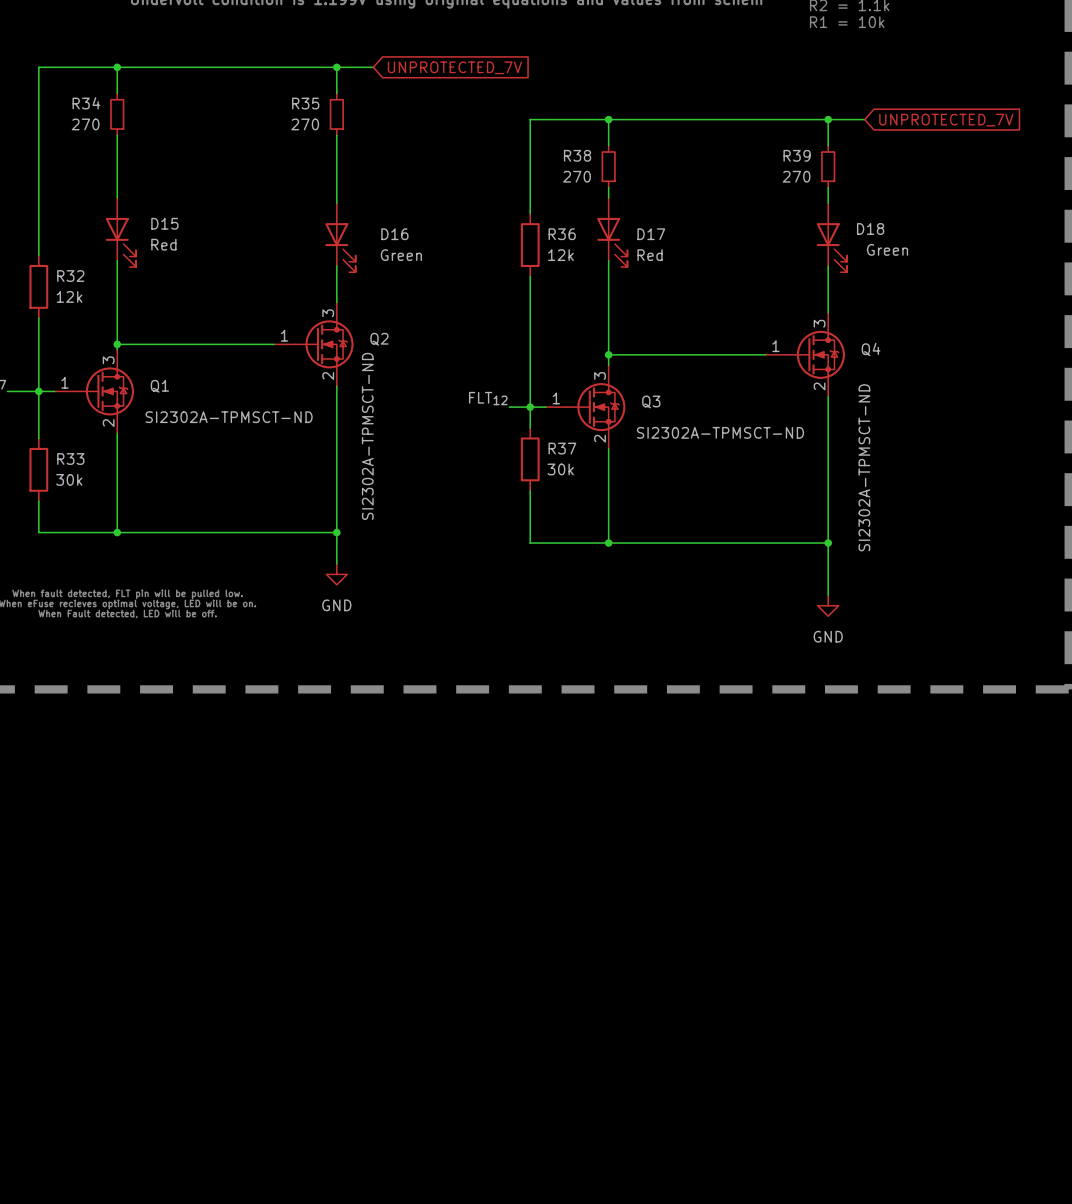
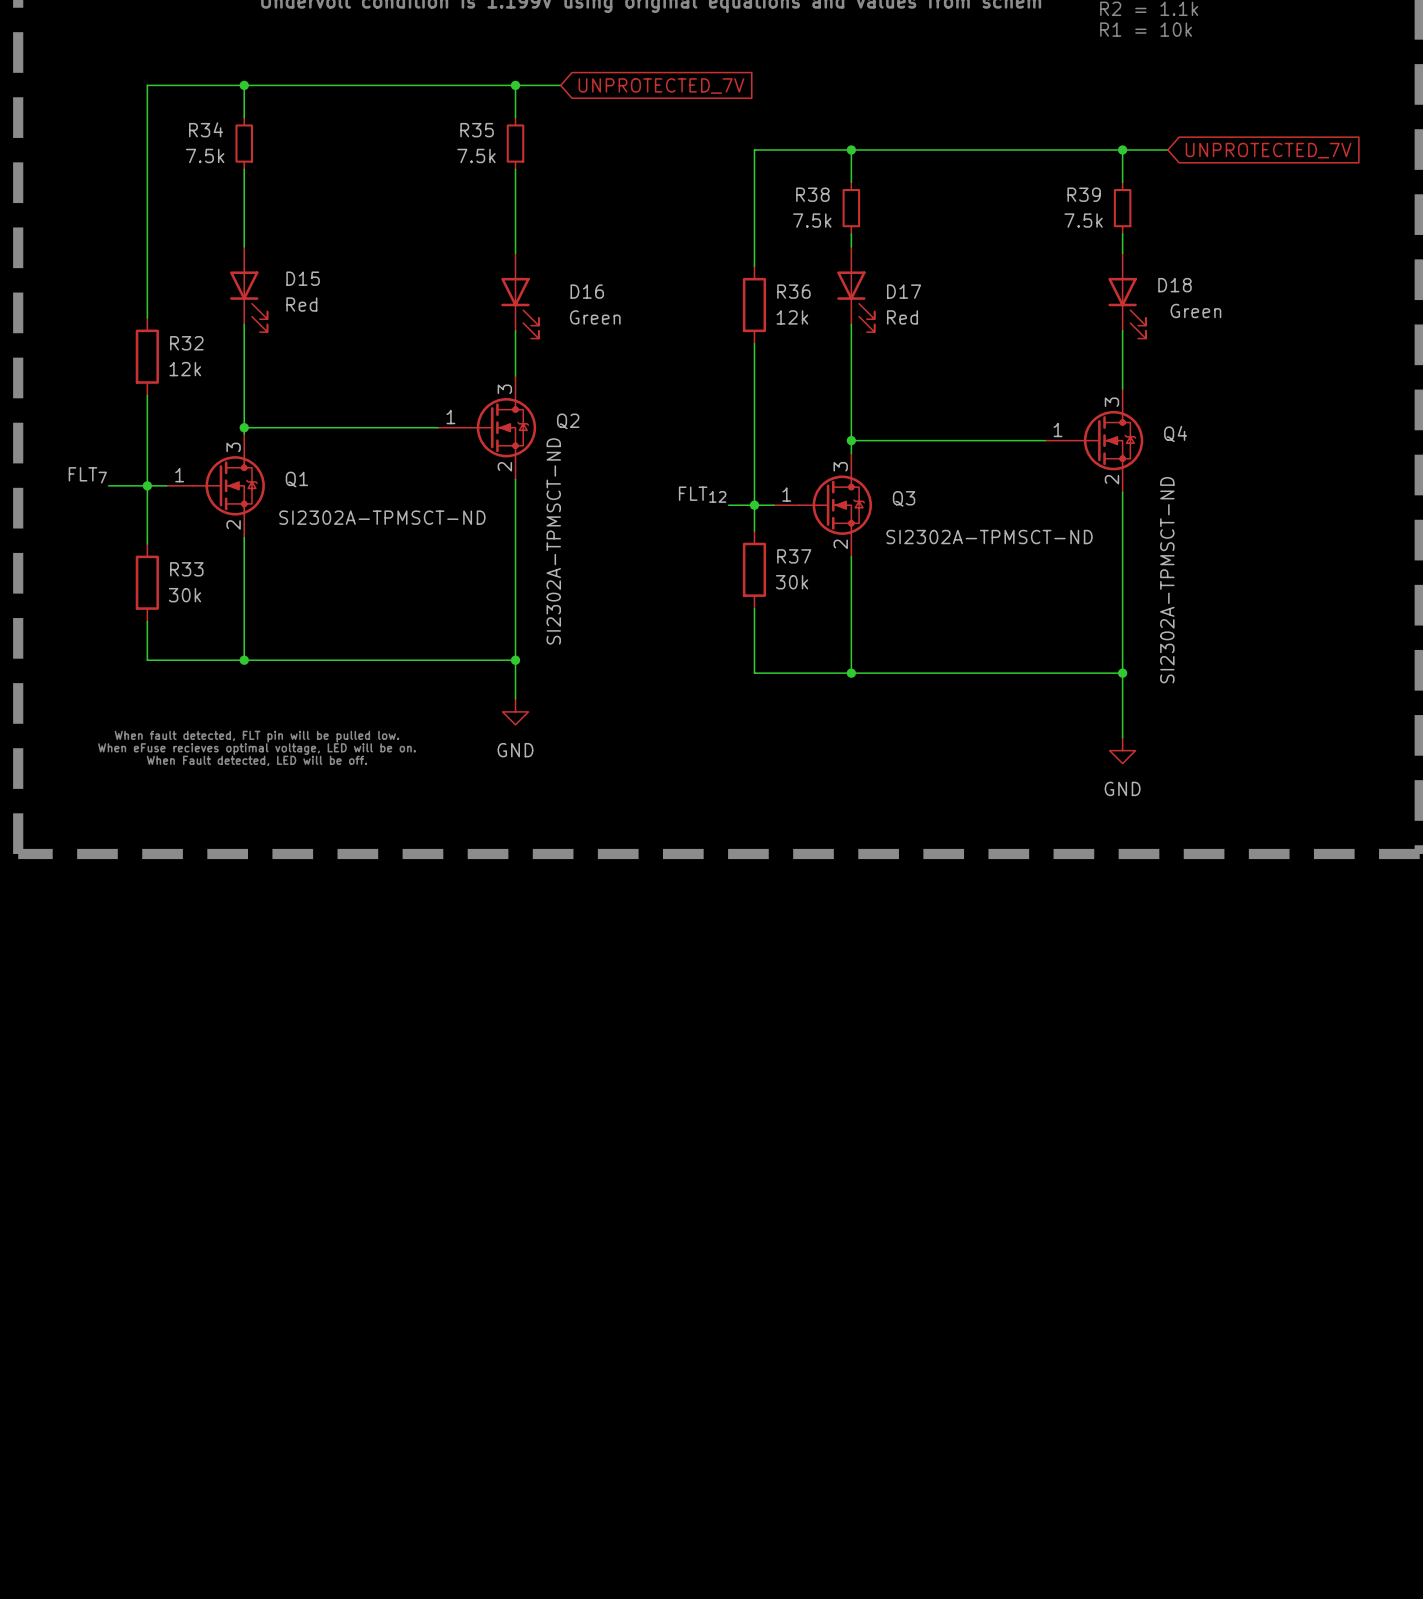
R34 value: 270 (85, 124) -> 7.5k (205, 155)
R35 value: 270 (305, 124) -> 7.5k (476, 155)
R38 value: 270 (577, 176) -> 7.5k (812, 220)
R39 value: 270 (796, 176) -> 7.5k (1083, 220)

